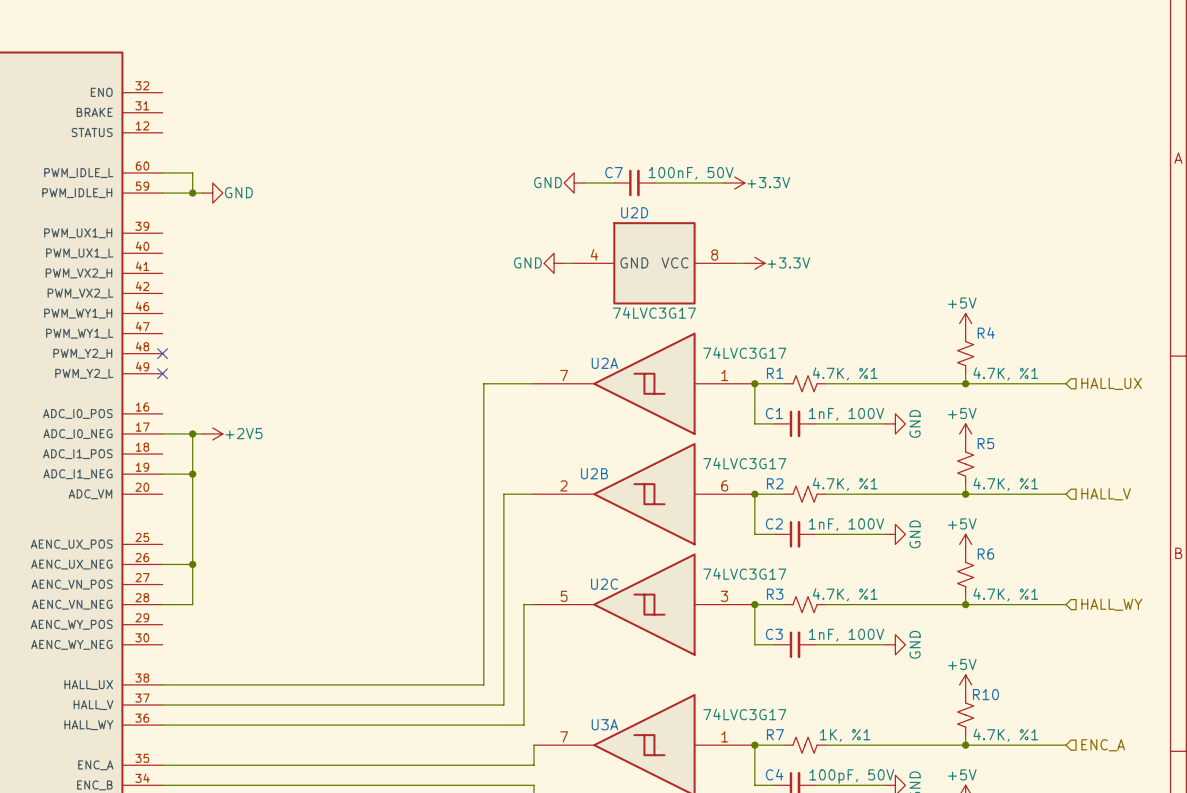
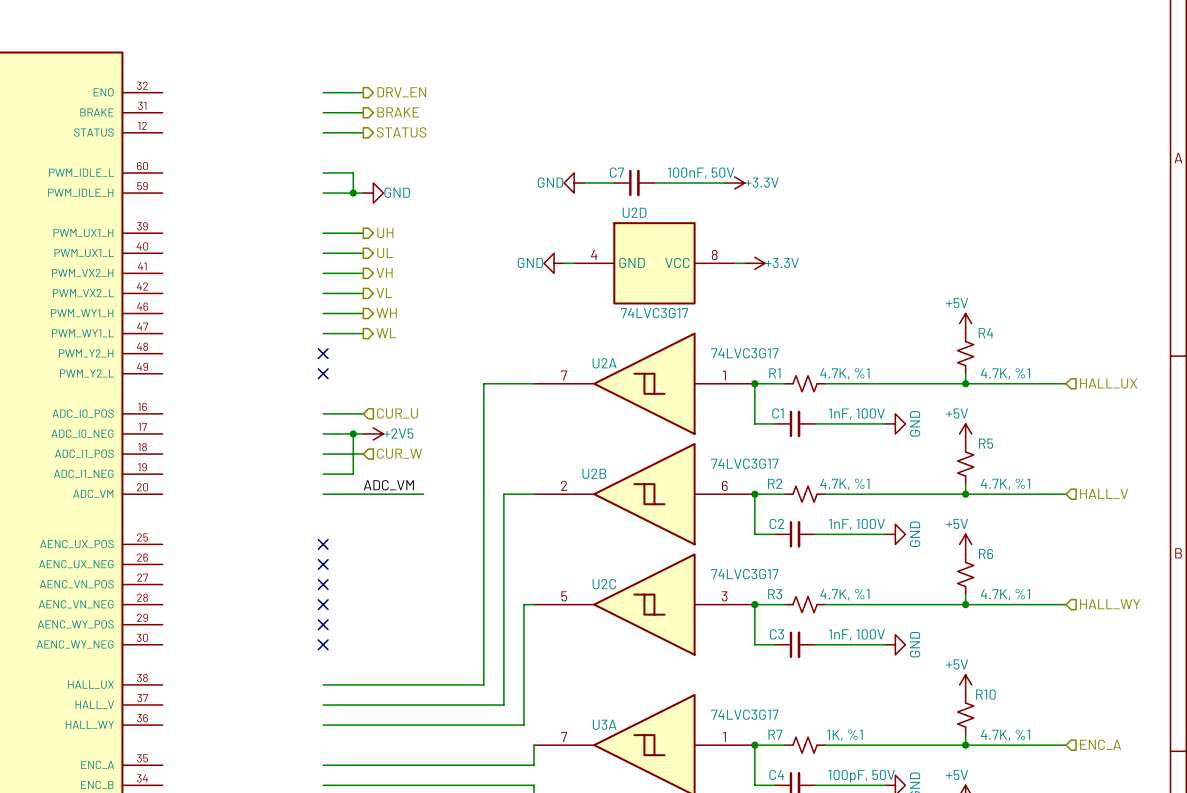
wire: none -> (323, 92) (363, 92)
hierarchical label: none -> DRV_EN (401, 92)
wire: none -> (323, 112) (363, 112)
hierarchical label: none -> BRAKE (398, 112)
wire: none -> (323, 132) (363, 132)
hierarchical label: none -> STATUS (401, 132)
wire: (162, 172) (192, 172) (192, 193) -> (323, 172) (353, 172) (353, 193)
wire: (162, 193) (202, 193) -> (323, 193) (363, 193)
junction: (192, 193) -> none
power symbol position: GND (212, 193) -> GND (373, 193)
junction: none -> (353, 193)
hierarchical label: none -> UH (385, 232)
wire: none -> (323, 233) (363, 233)
hierarchical label: none -> UL (385, 252)
wire: none -> (323, 253) (363, 253)
hierarchical label: none -> VH (384, 272)
wire: none -> (323, 273) (363, 273)
wire: none -> (323, 293) (363, 293)
hierarchical label: none -> VL (384, 293)
wire: none -> (323, 313) (363, 313)
hierarchical label: none -> WH (386, 313)
wire: none -> (323, 333) (363, 333)
hierarchical label: none -> WL (386, 333)
no-connect mark: (162, 353) -> none
no-connect mark: none -> (323, 353)
no-connect mark: (162, 373) -> none
no-connect mark: none -> (323, 373)
wire: none -> (323, 413) (363, 413)
hierarchical label: none -> CUR_U (397, 413)
wire: (162, 433) (202, 433) -> (323, 433) (363, 433)
wire: (192, 433) (192, 604) (162, 604) -> none
junction: (192, 433) -> none
power symbol position: +2V5 (212, 433) -> +2V5 (373, 433)
wire: none -> (353, 433) (353, 474) (323, 474)
junction: none -> (353, 433)
wire: none -> (323, 454) (363, 454)
hierarchical label: none -> CUR_W (399, 453)
wire: (162, 474) (192, 474) -> none
junction: (192, 474) -> none
label: none -> ADC_VM (388, 485)
wire: none -> (323, 494) (423, 494)
no-connect mark: none -> (323, 544)
wire: (162, 564) (192, 564) -> none
junction: (192, 564) -> none
no-connect mark: none -> (323, 564)
no-connect mark: none -> (323, 584)
no-connect mark: none -> (323, 604)
no-connect mark: none -> (323, 624)
no-connect mark: none -> (323, 644)
wire: (162, 684) (323, 684) -> none
wire: (162, 705) (323, 705) -> none
wire: (162, 725) (323, 725) -> none
wire: (162, 765) (323, 765) -> none
wire: (162, 785) (323, 785) -> none

